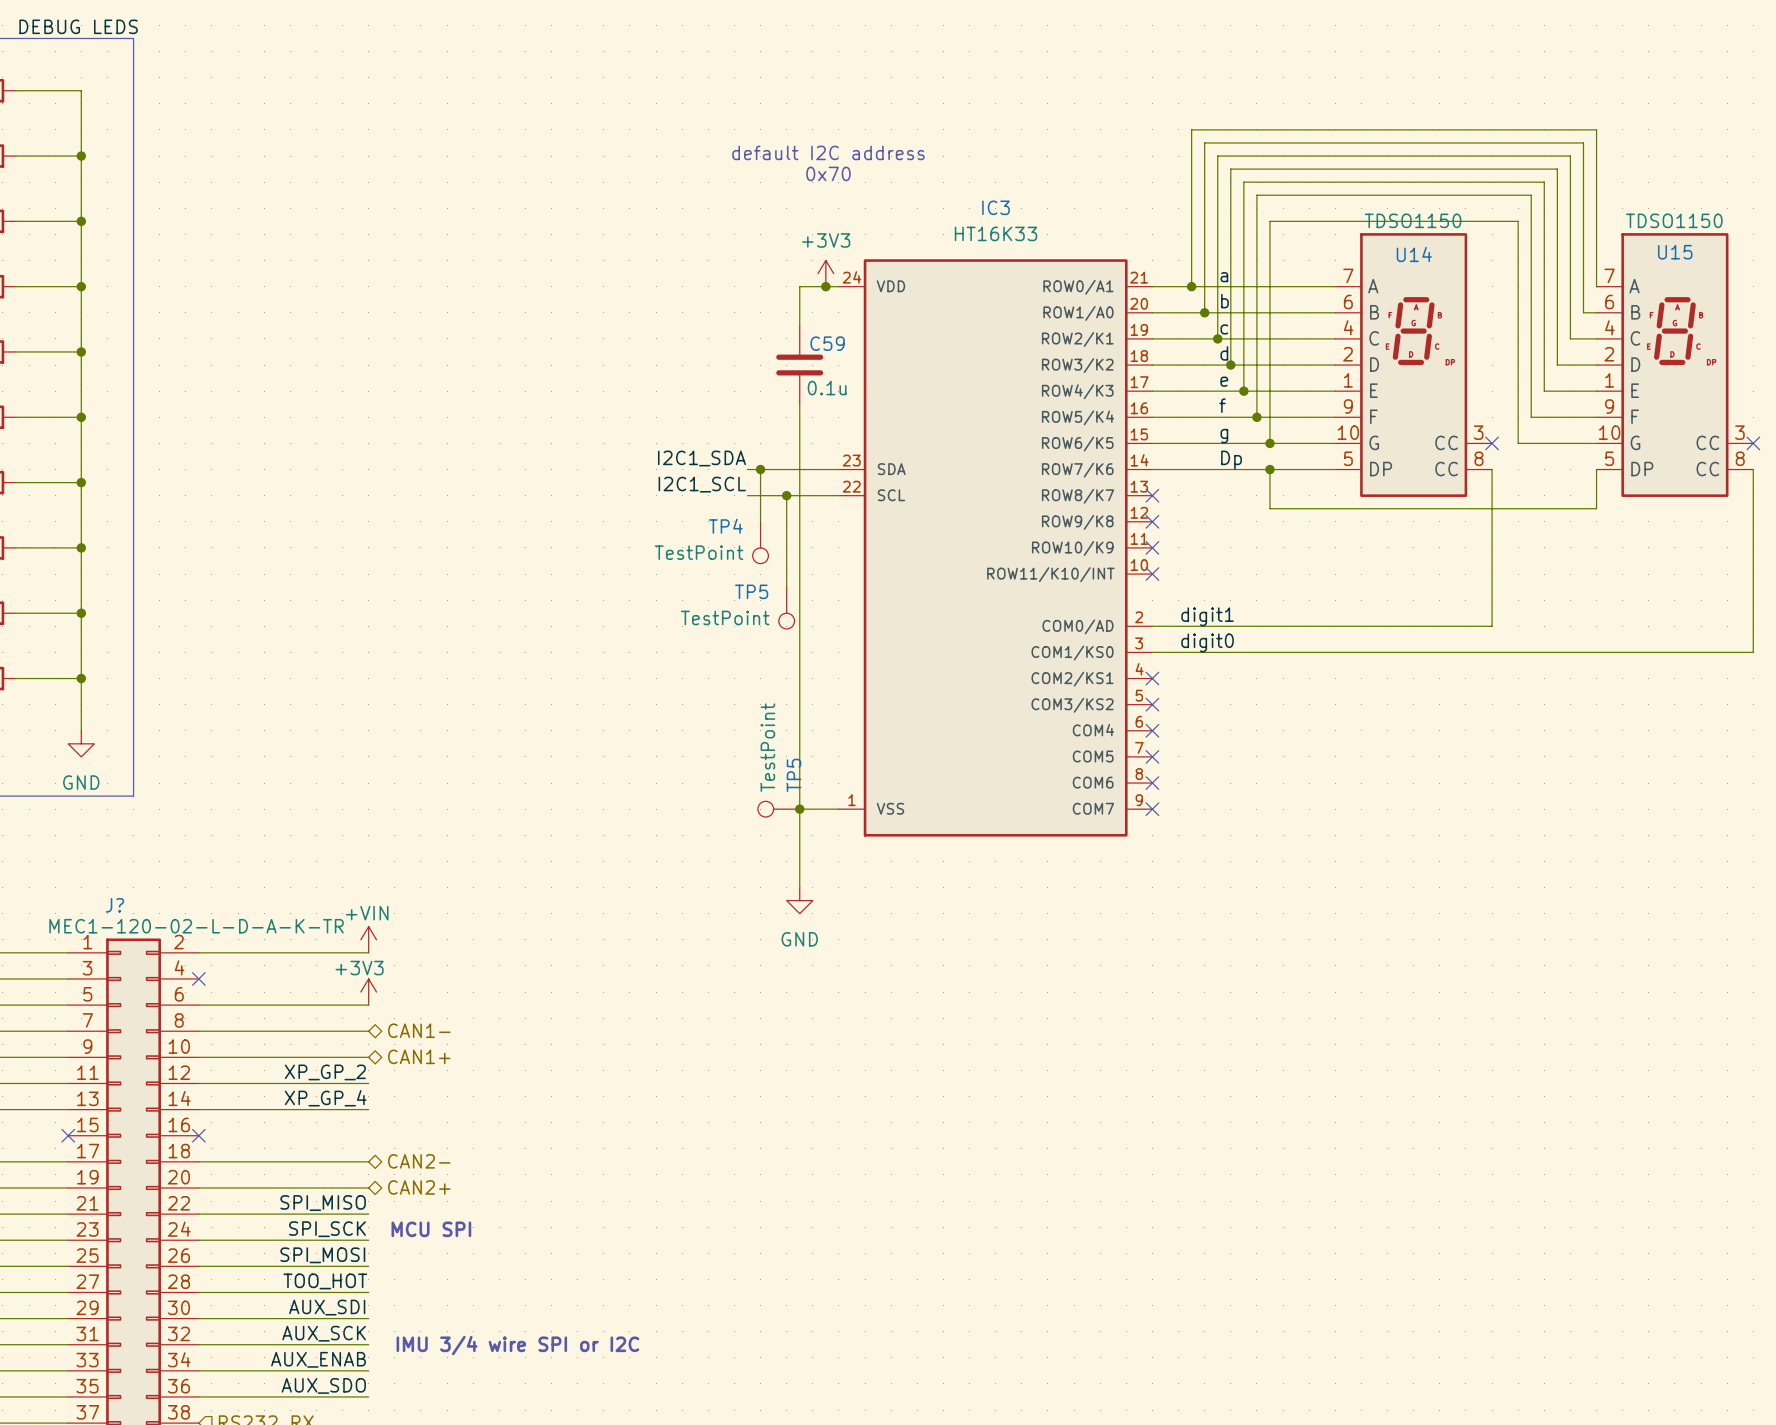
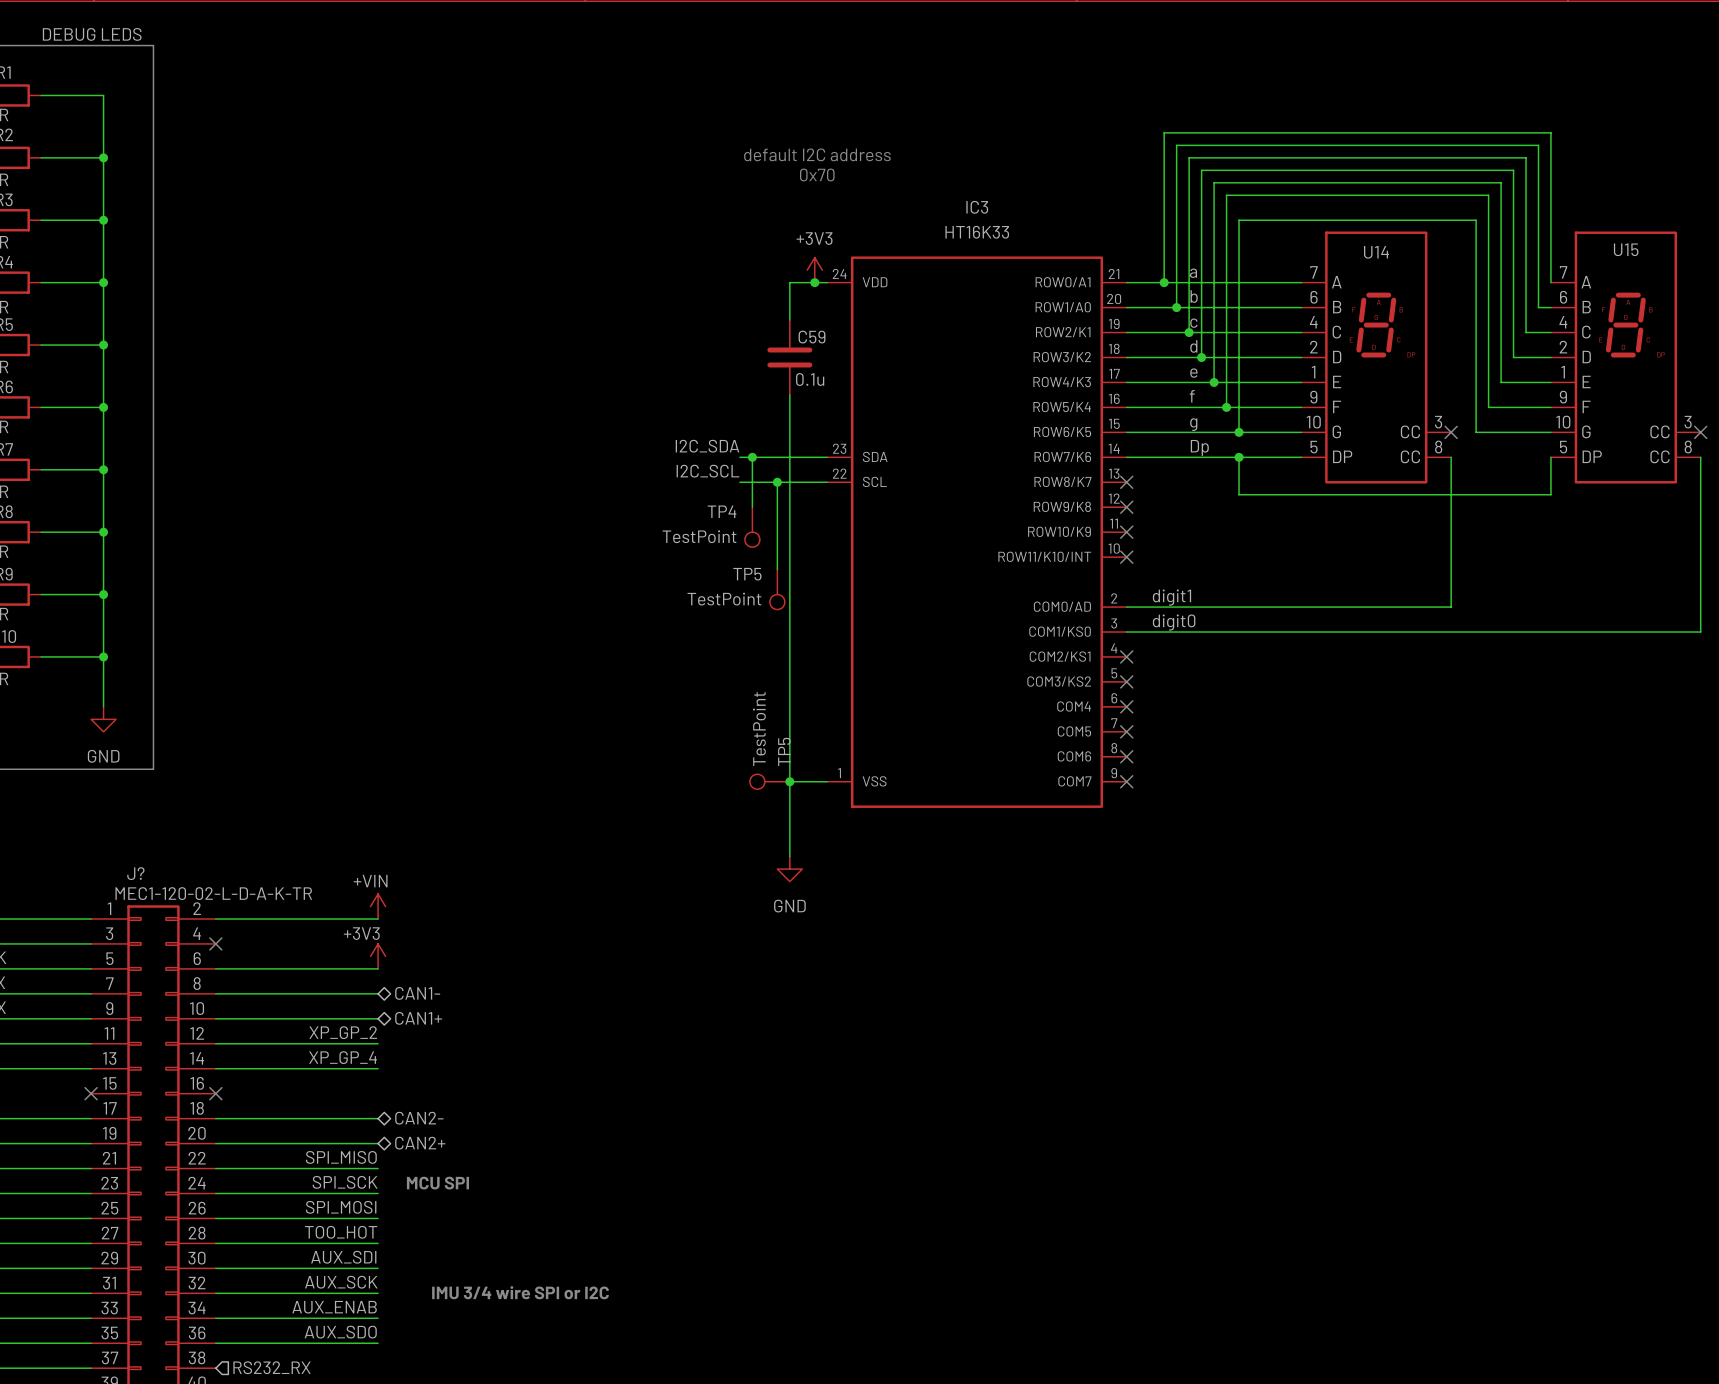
U14 value: TDSO1150 (1413, 220) -> none
U15 value: TDSO1150 (1674, 220) -> none
label: I2C1_SDA (701, 458) -> I2C_SDA (707, 446)
label: I2C1_SCL (702, 484) -> I2C_SCL (707, 471)

